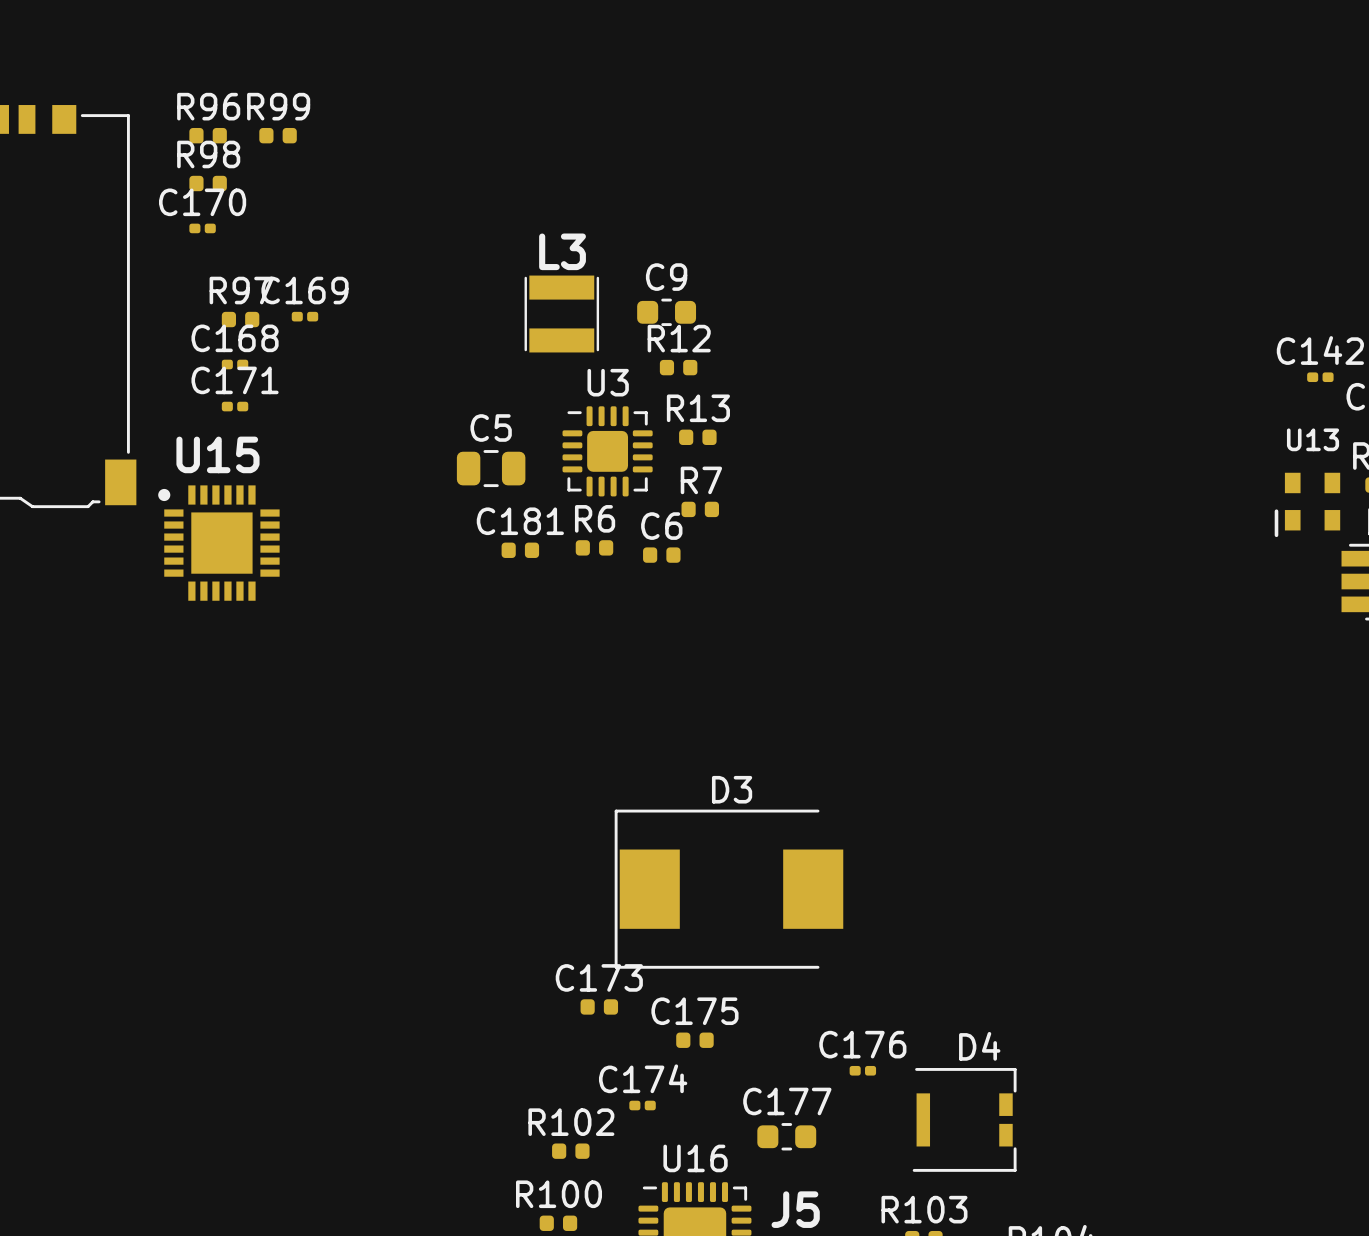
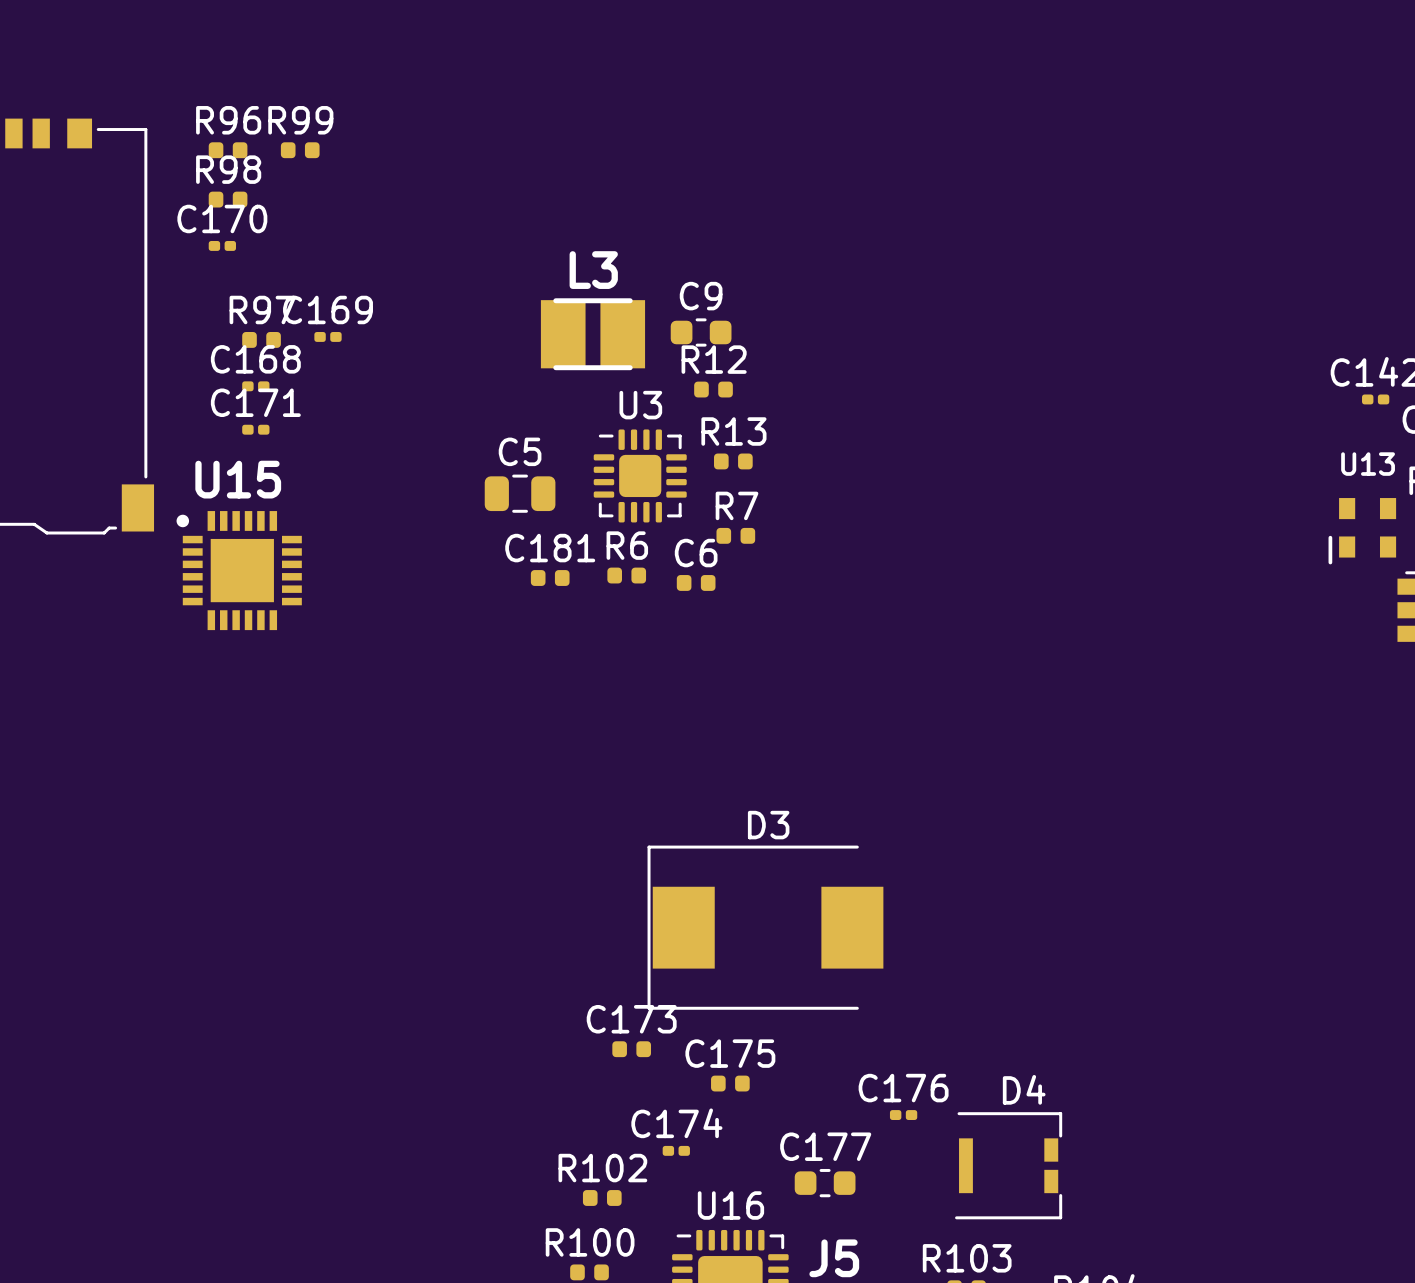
L3 footprint: [524, 275, 600, 353] -> [540, 298, 646, 371]

